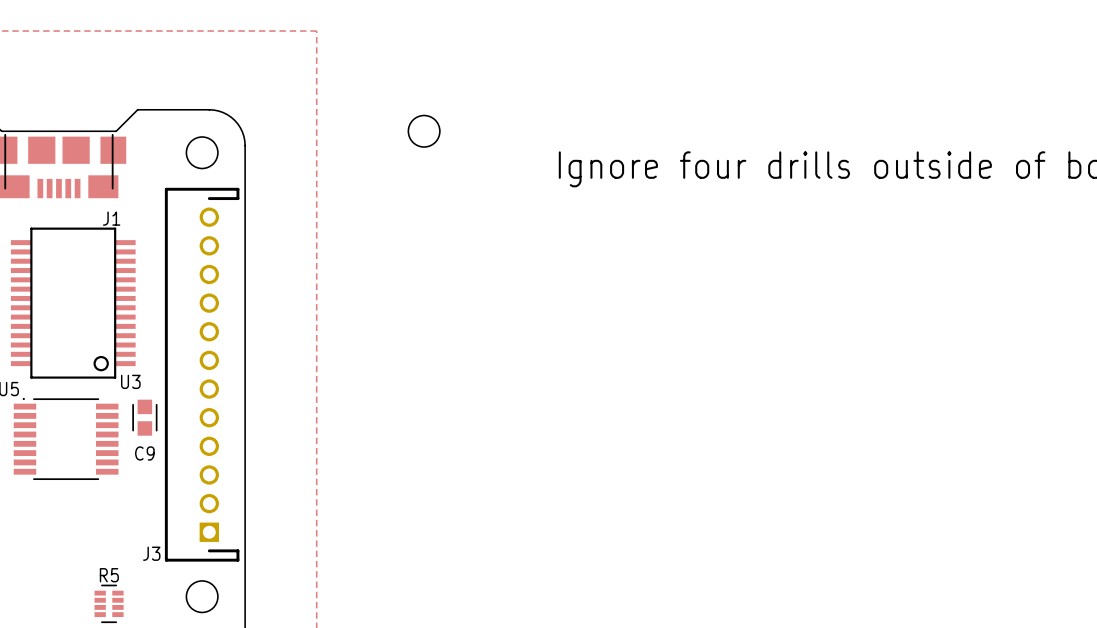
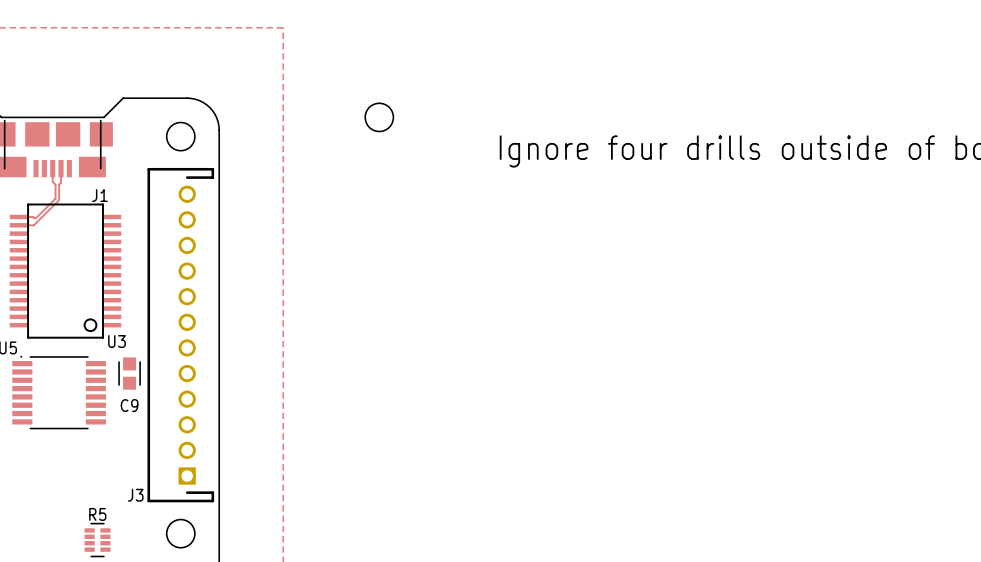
track: none -> (52, 168) (55, 198) (36, 218) (18, 216)
track: none -> (61, 168) (59, 200) (33, 225) (18, 225)

